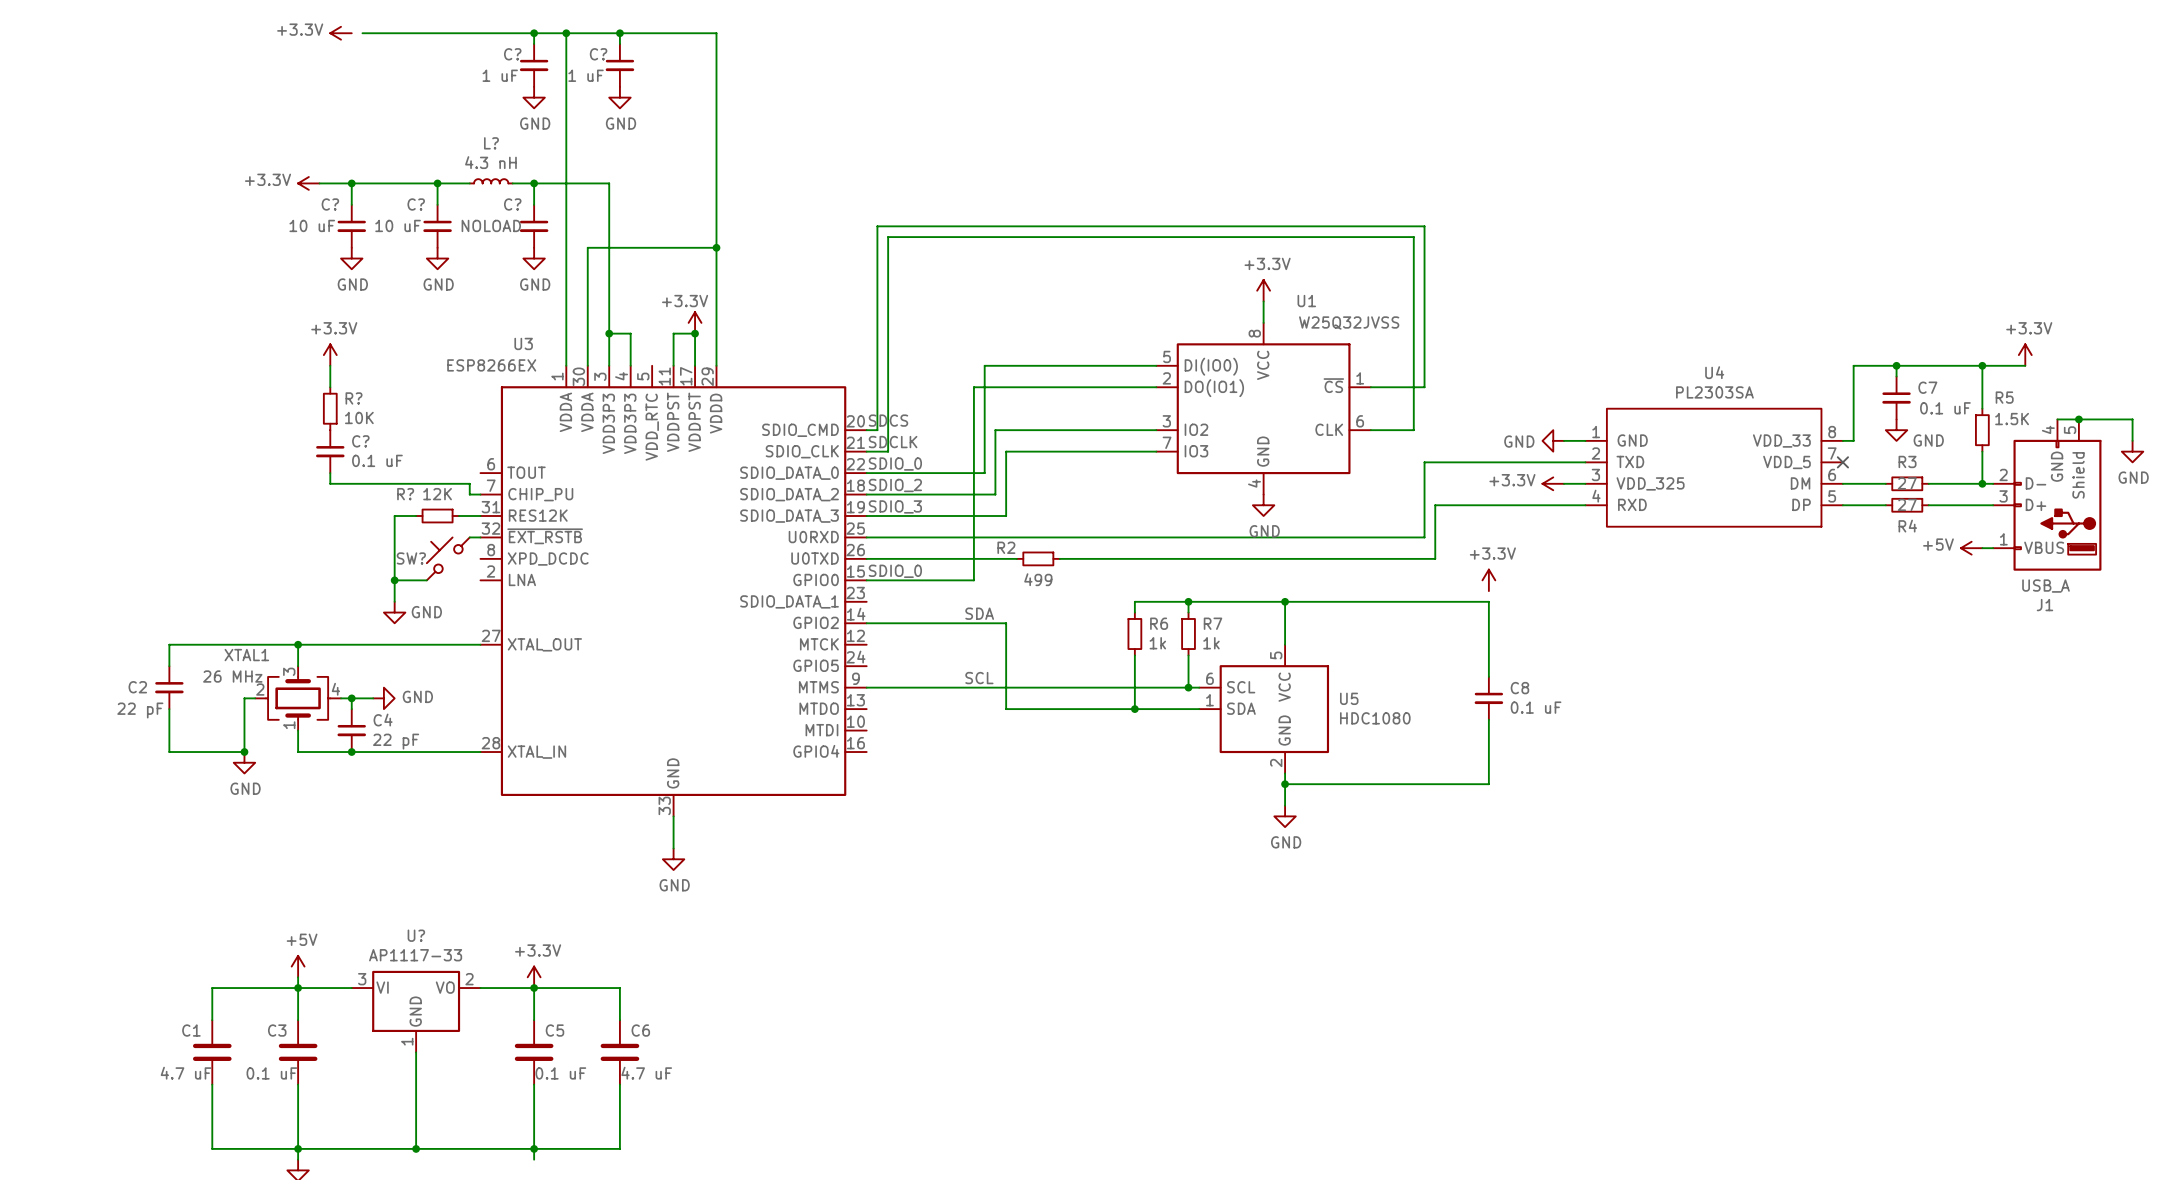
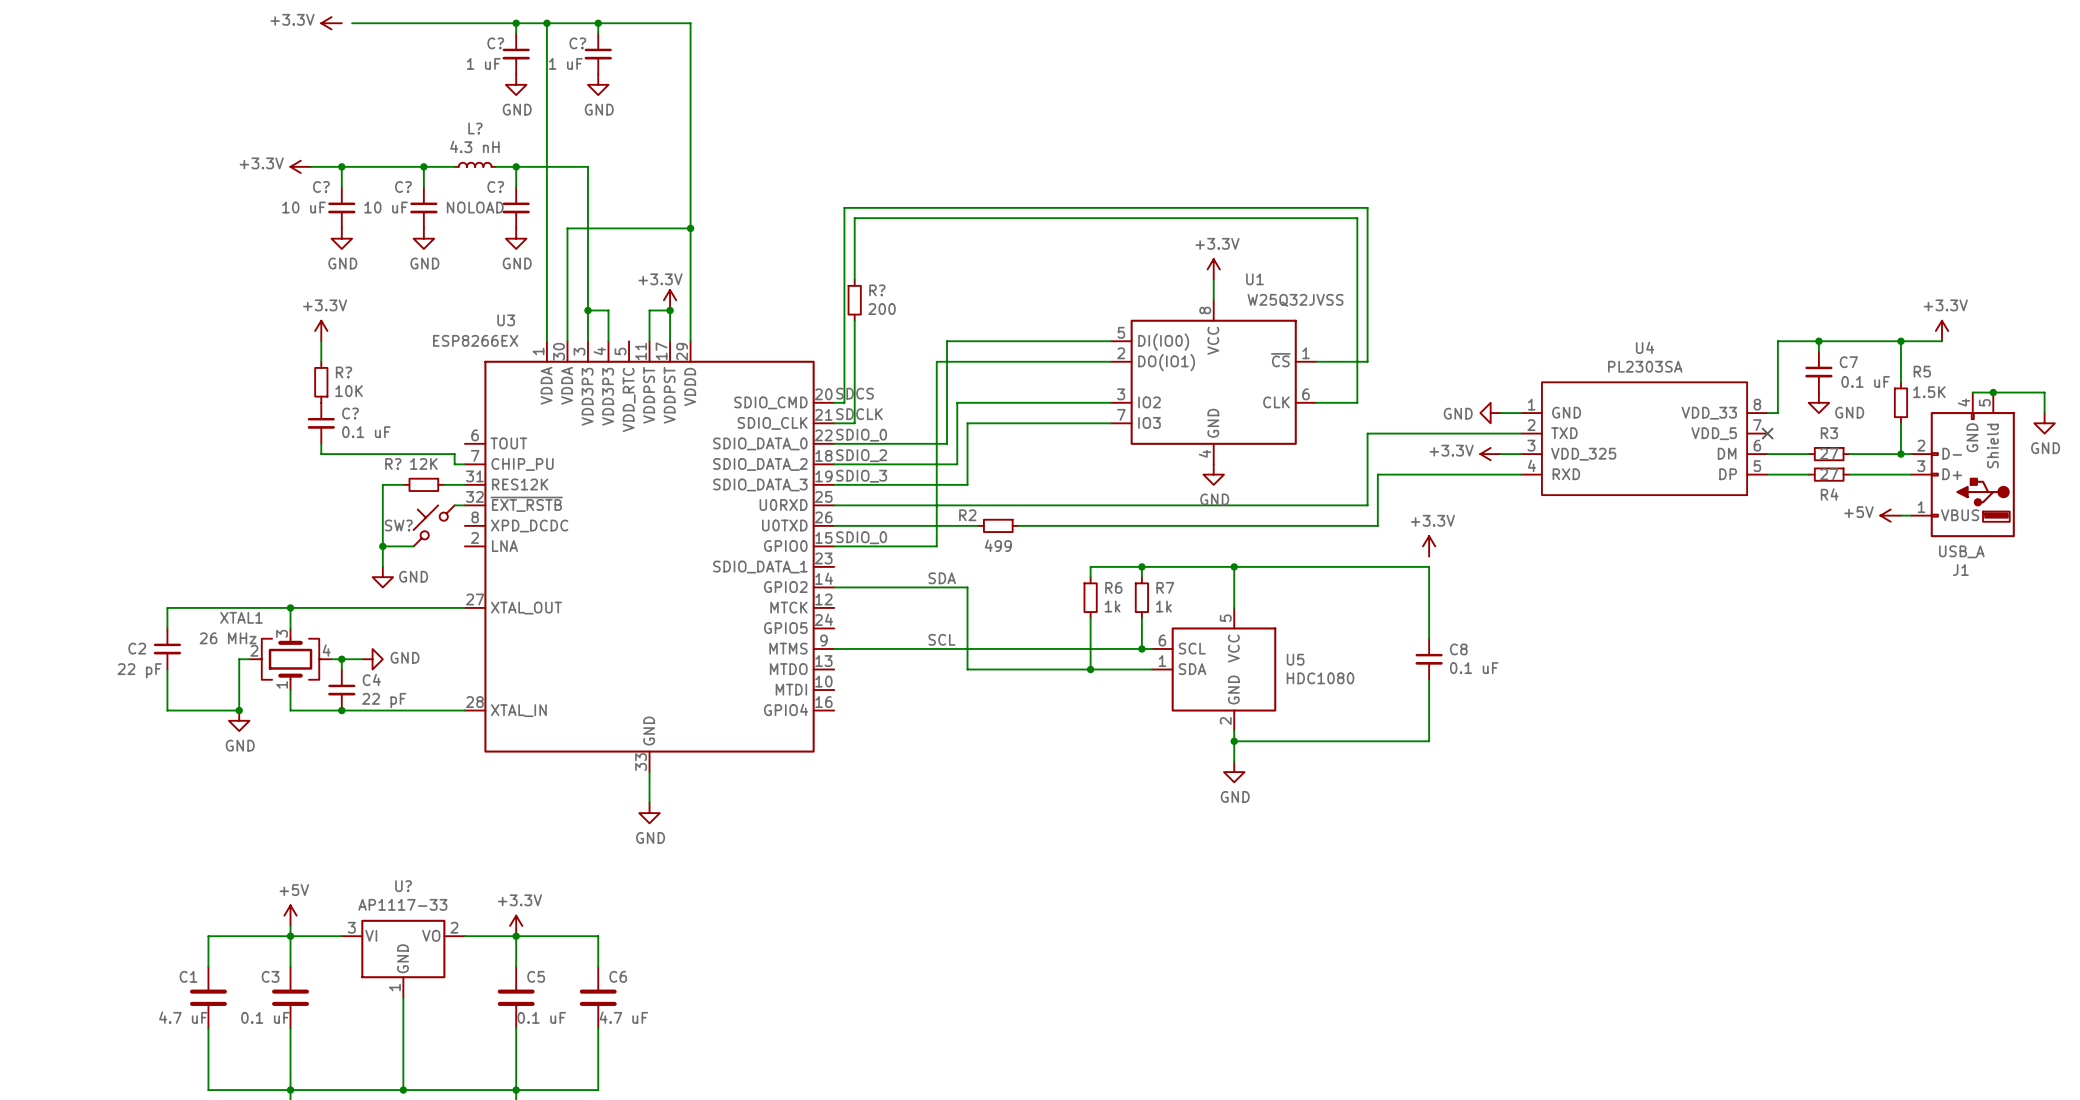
wire: (888, 301) (888, 344) -> none
R?: none -> 200 (854, 300)

